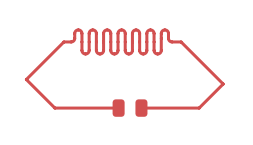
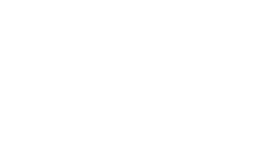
part: (130, 108) -> none
top track: (141, 108) (199, 108) (223, 84) (181, 41) (169, 40) (168, 32) (164, 29) (161, 33) (161, 51) (157, 53) (154, 51) (154, 33) (151, 30) (147, 32) (146, 50) (143, 53) (139, 51) (139, 33) (137, 30) (132, 32) (132, 50) (128, 53) (125, 51) (125, 33) (122, 30) (118, 32) (117, 50) (114, 53) (110, 51) (110, 33) (108, 30) (103, 32) (103, 50) (99, 53) (96, 50) (96, 32) (93, 29) (90, 30) (89, 51) (85, 53) (81, 50) (81, 32) (76, 30) (73, 40) (63, 41) (26, 79) (54, 108) (118, 108) -> none

